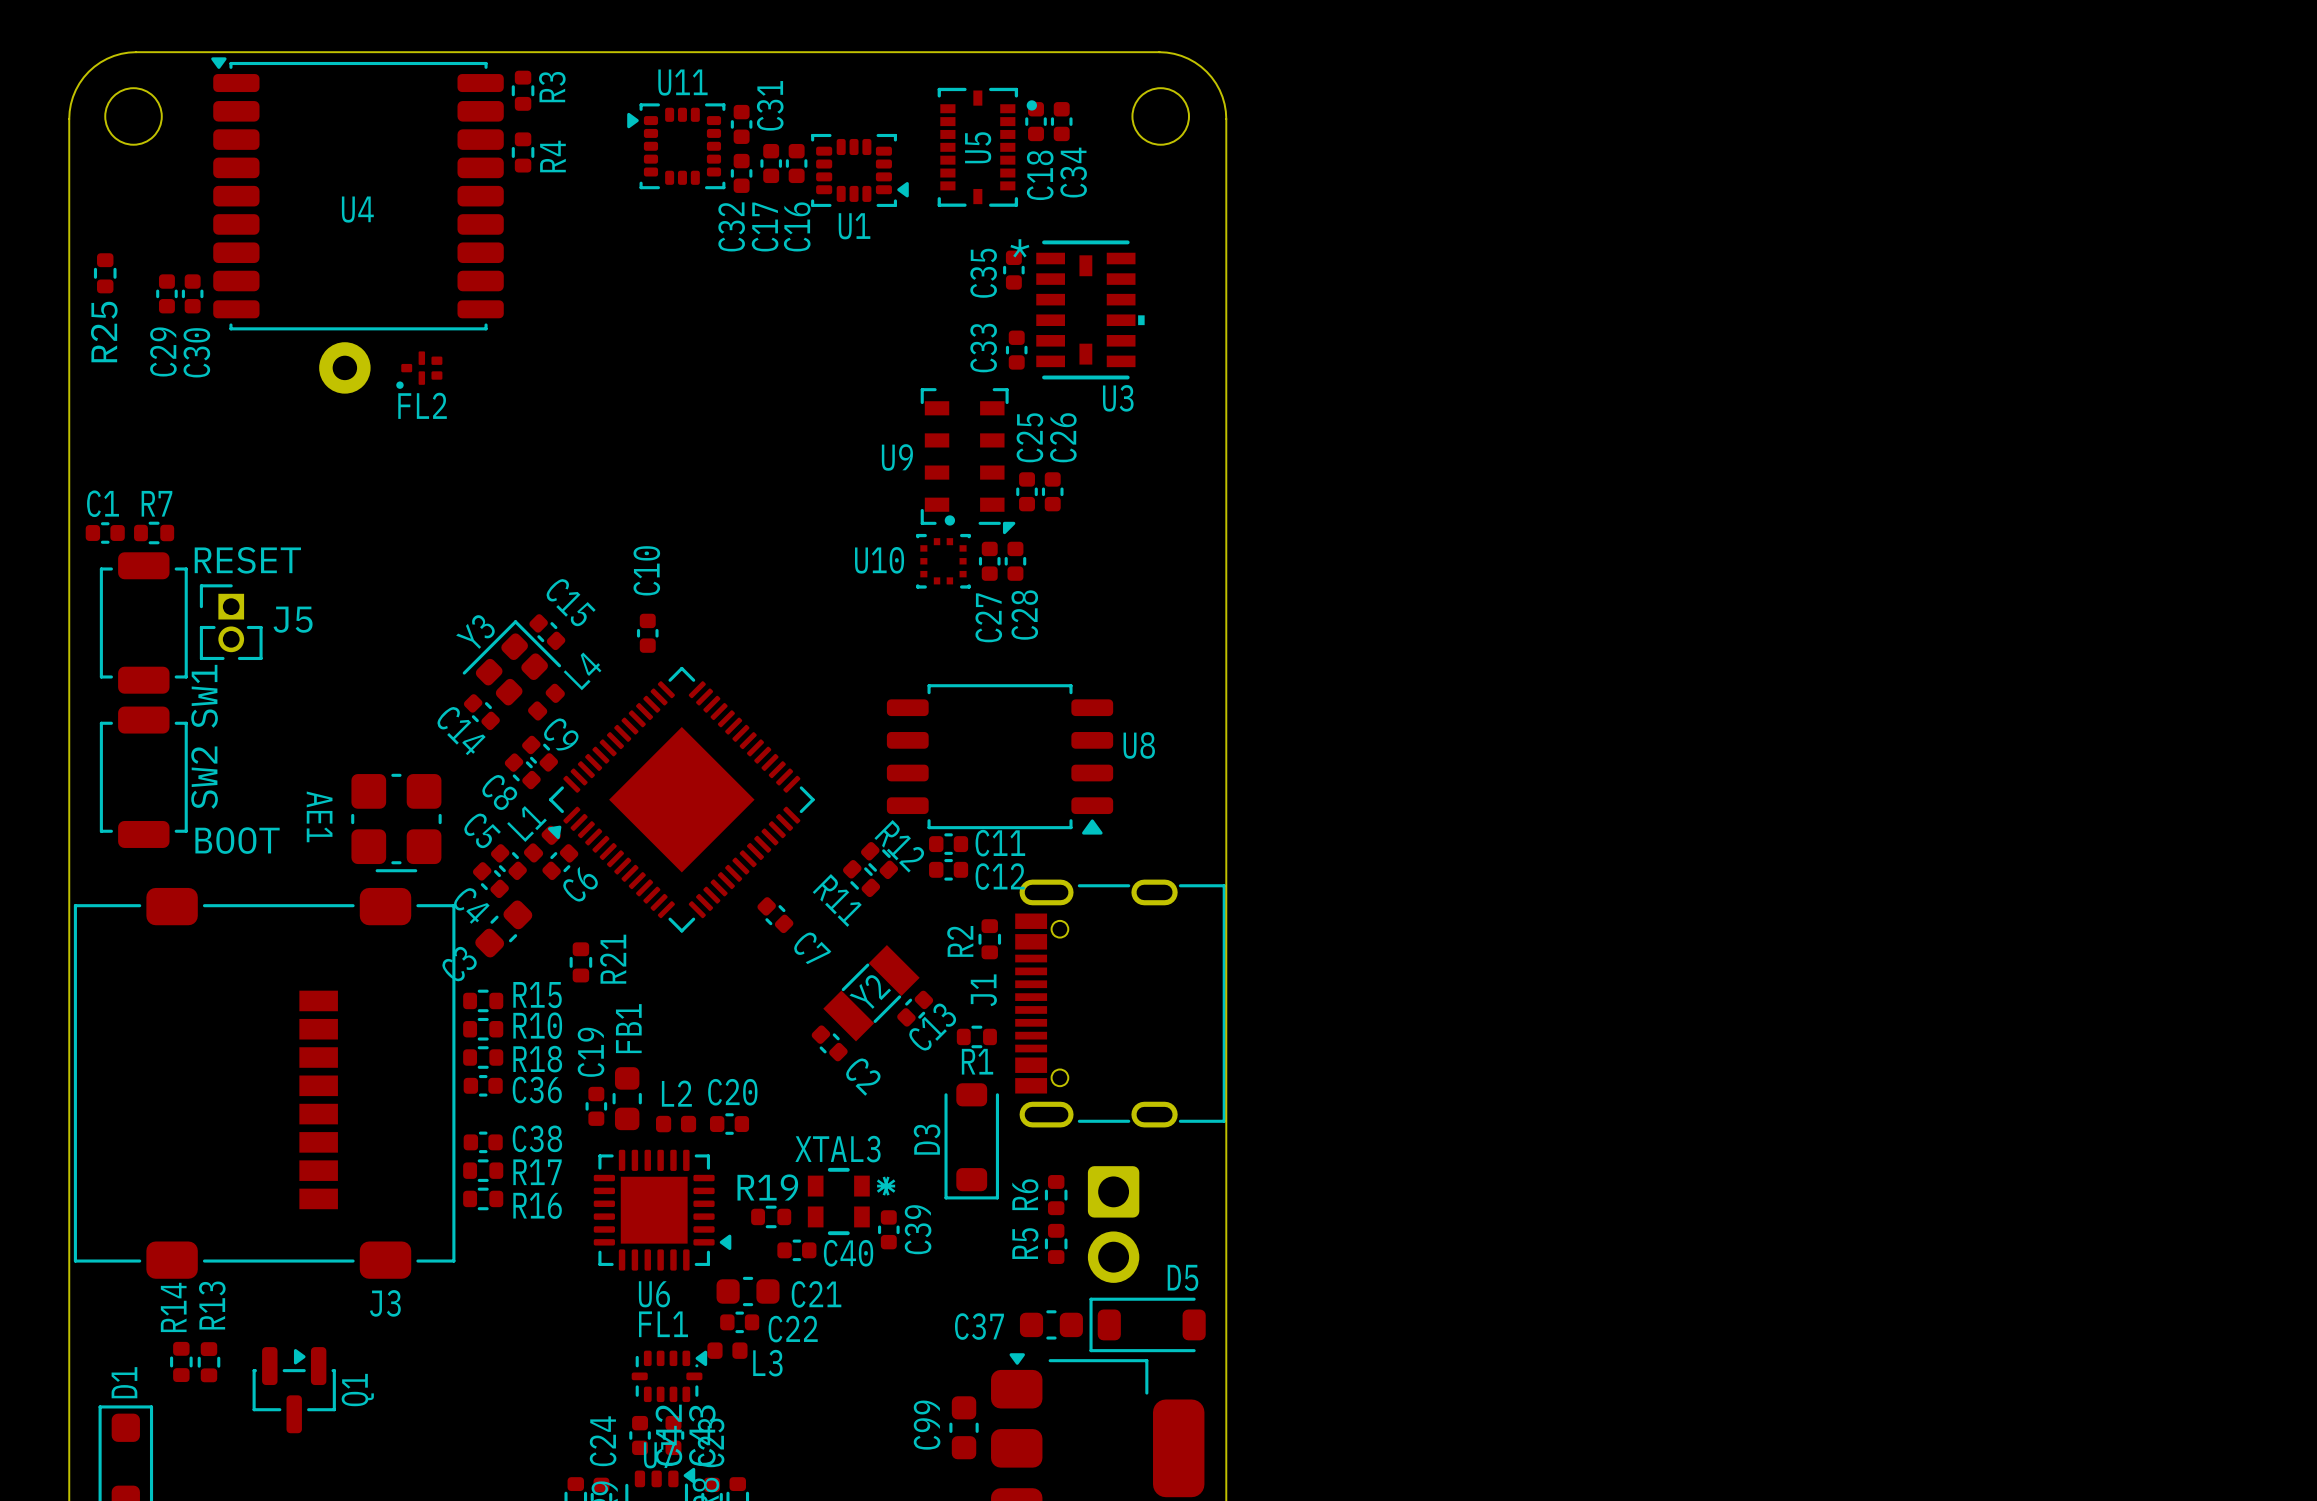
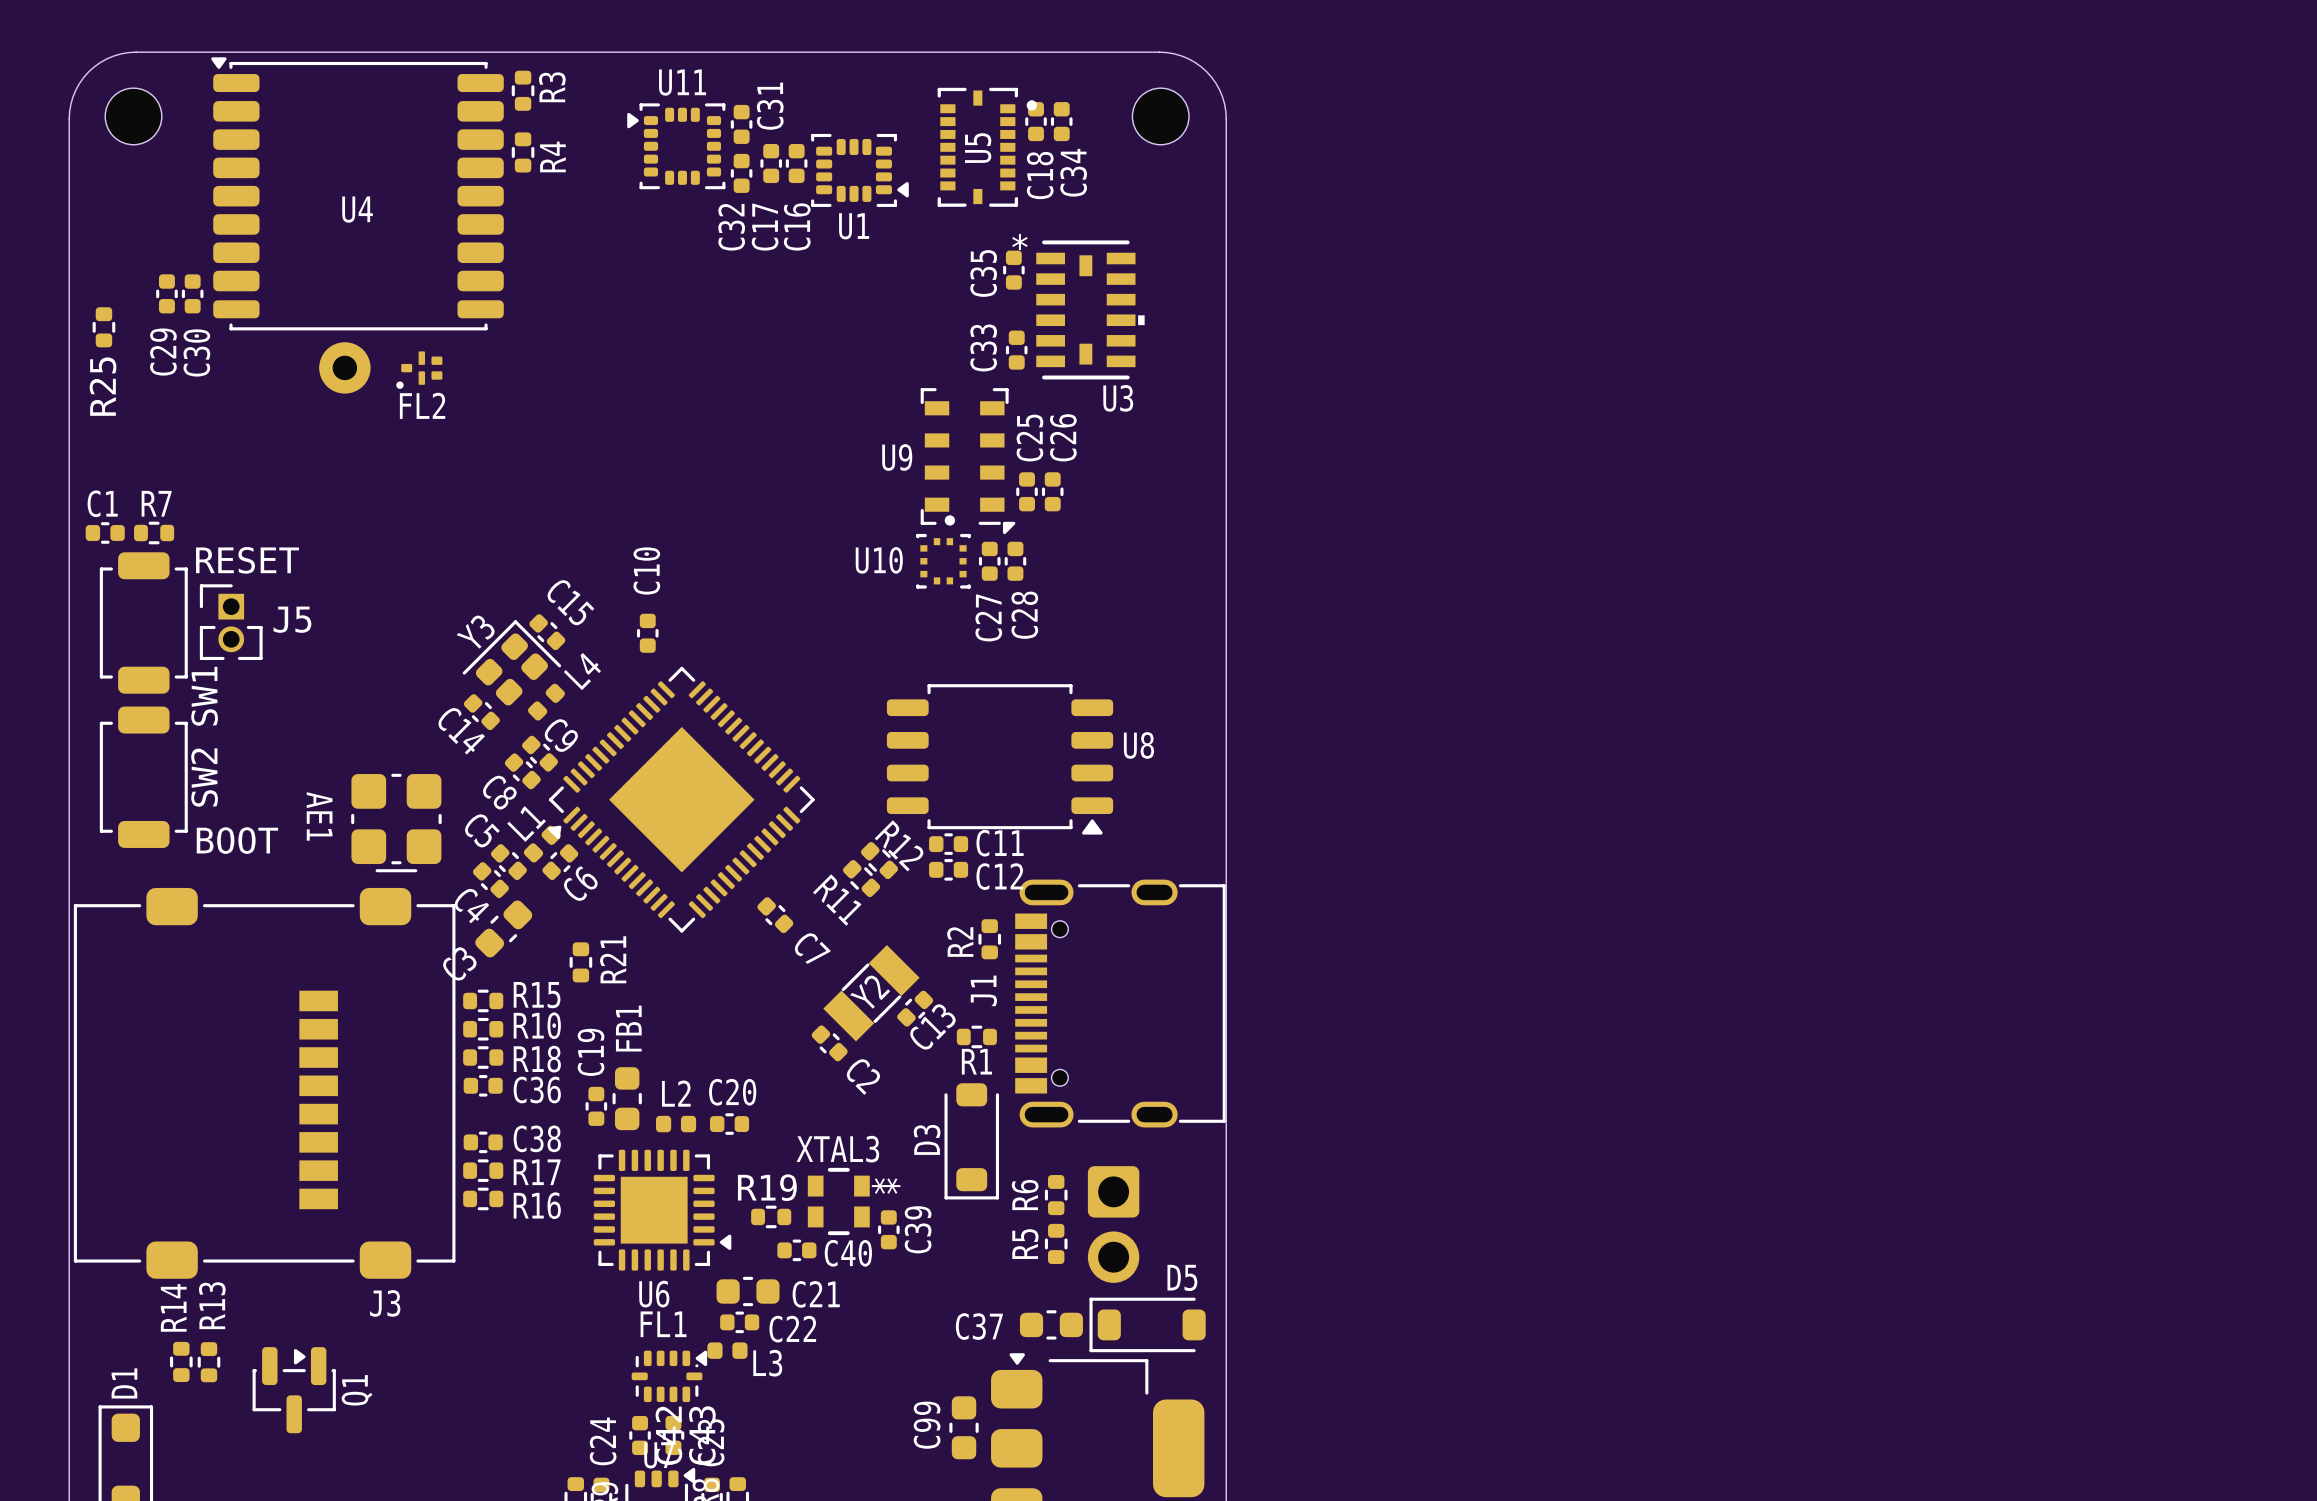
R25 position: (105, 273) -> (103, 327)

